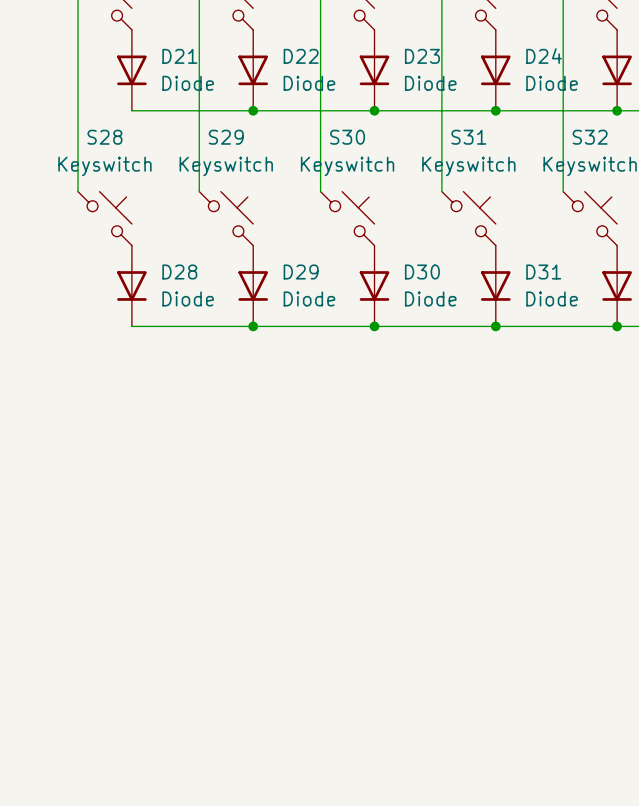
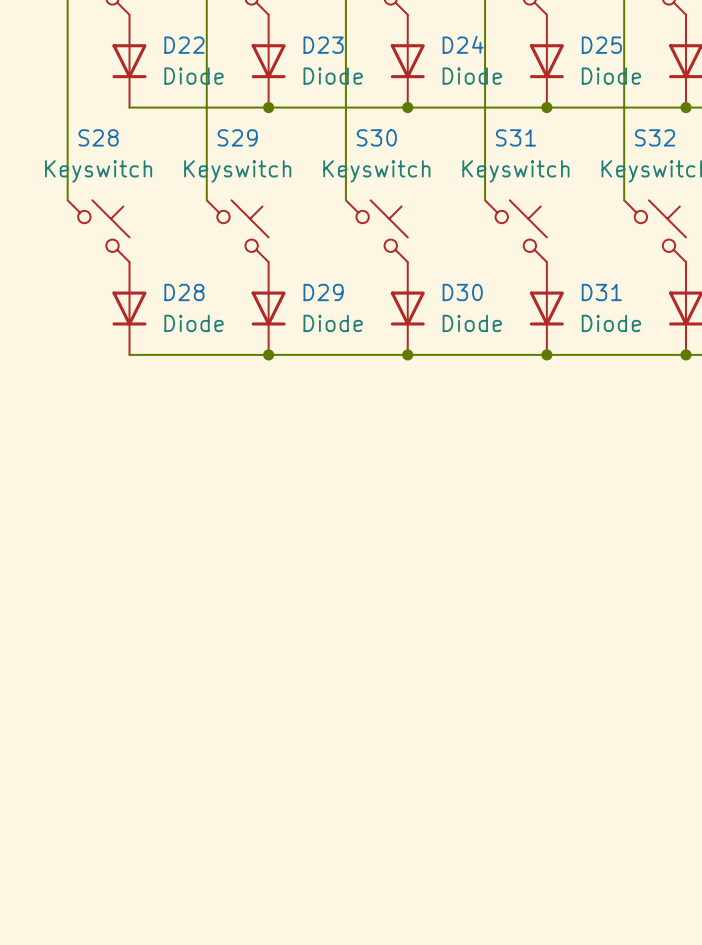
D21 name: D21 (179, 56) -> D22 (184, 45)
D22 name: D22 (301, 56) -> D23 (323, 45)
D23 name: D23 (422, 56) -> D24 (463, 44)
D24 name: D24 (544, 56) -> D25 (601, 45)

